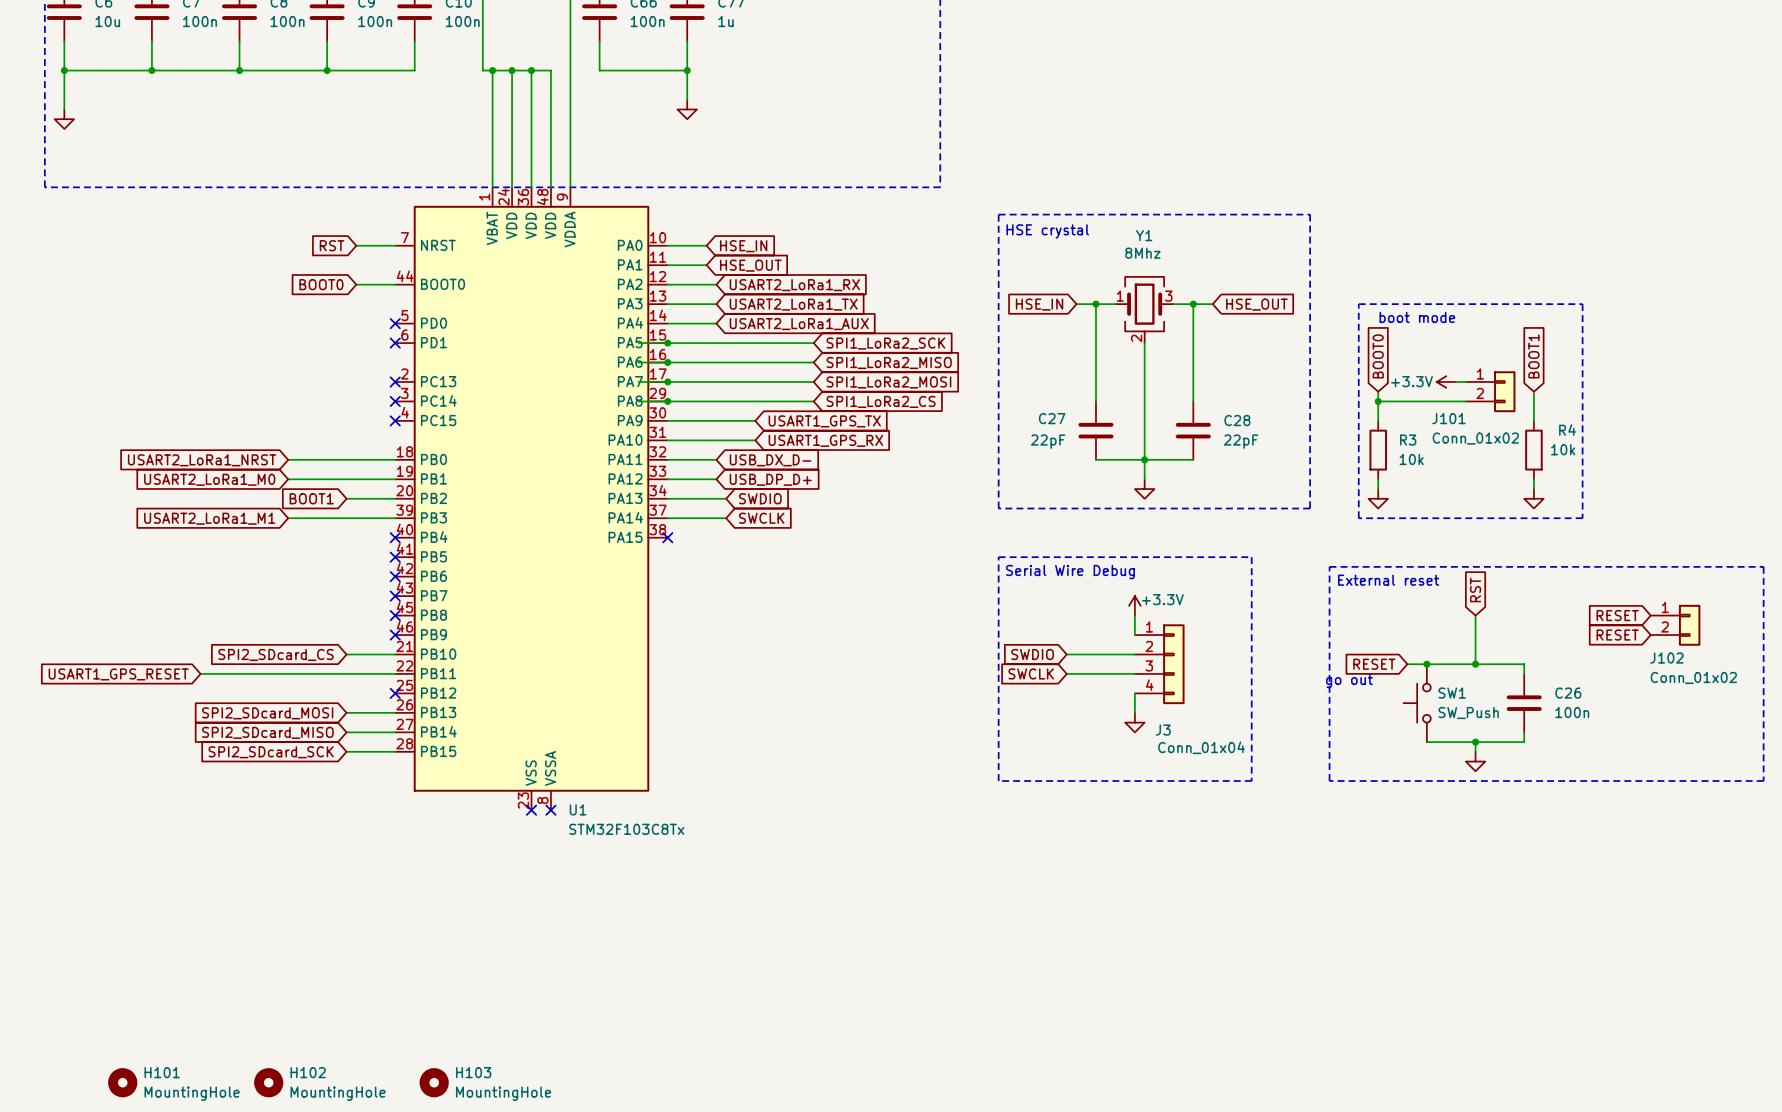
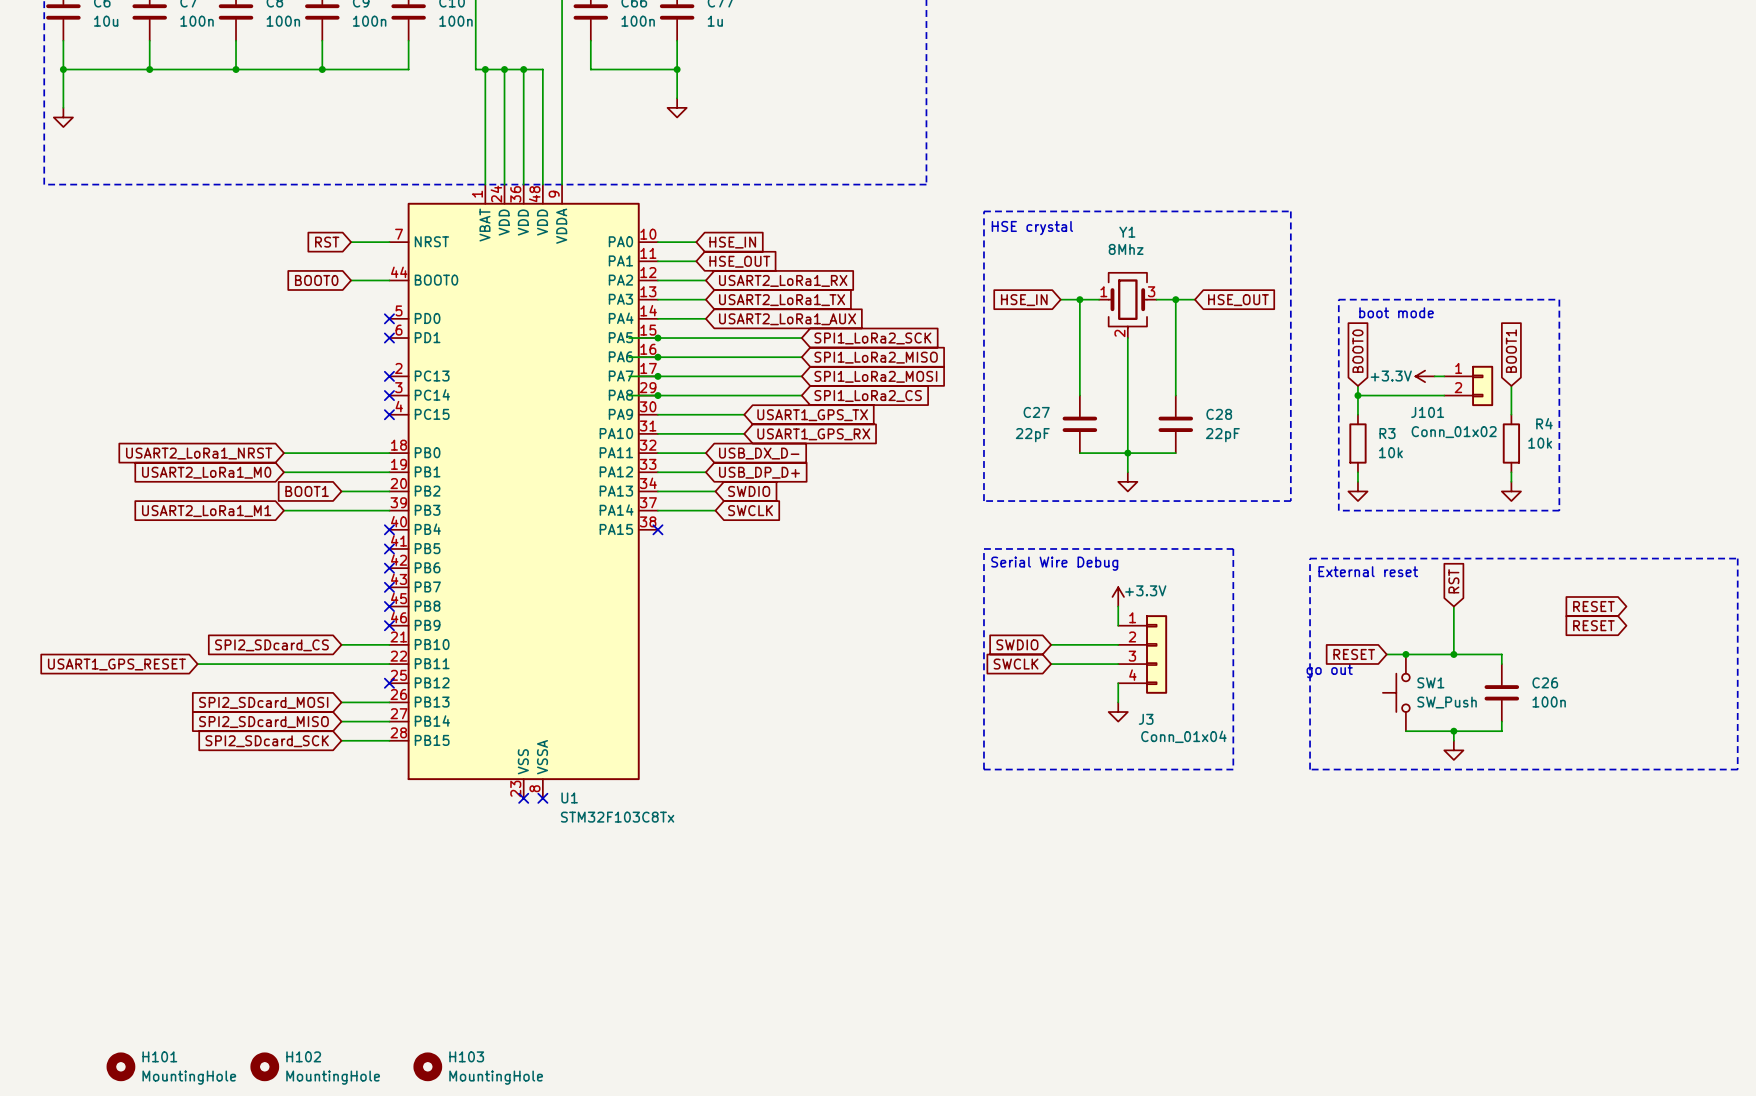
J102: Conn_01x02 (1675, 625) -> none

